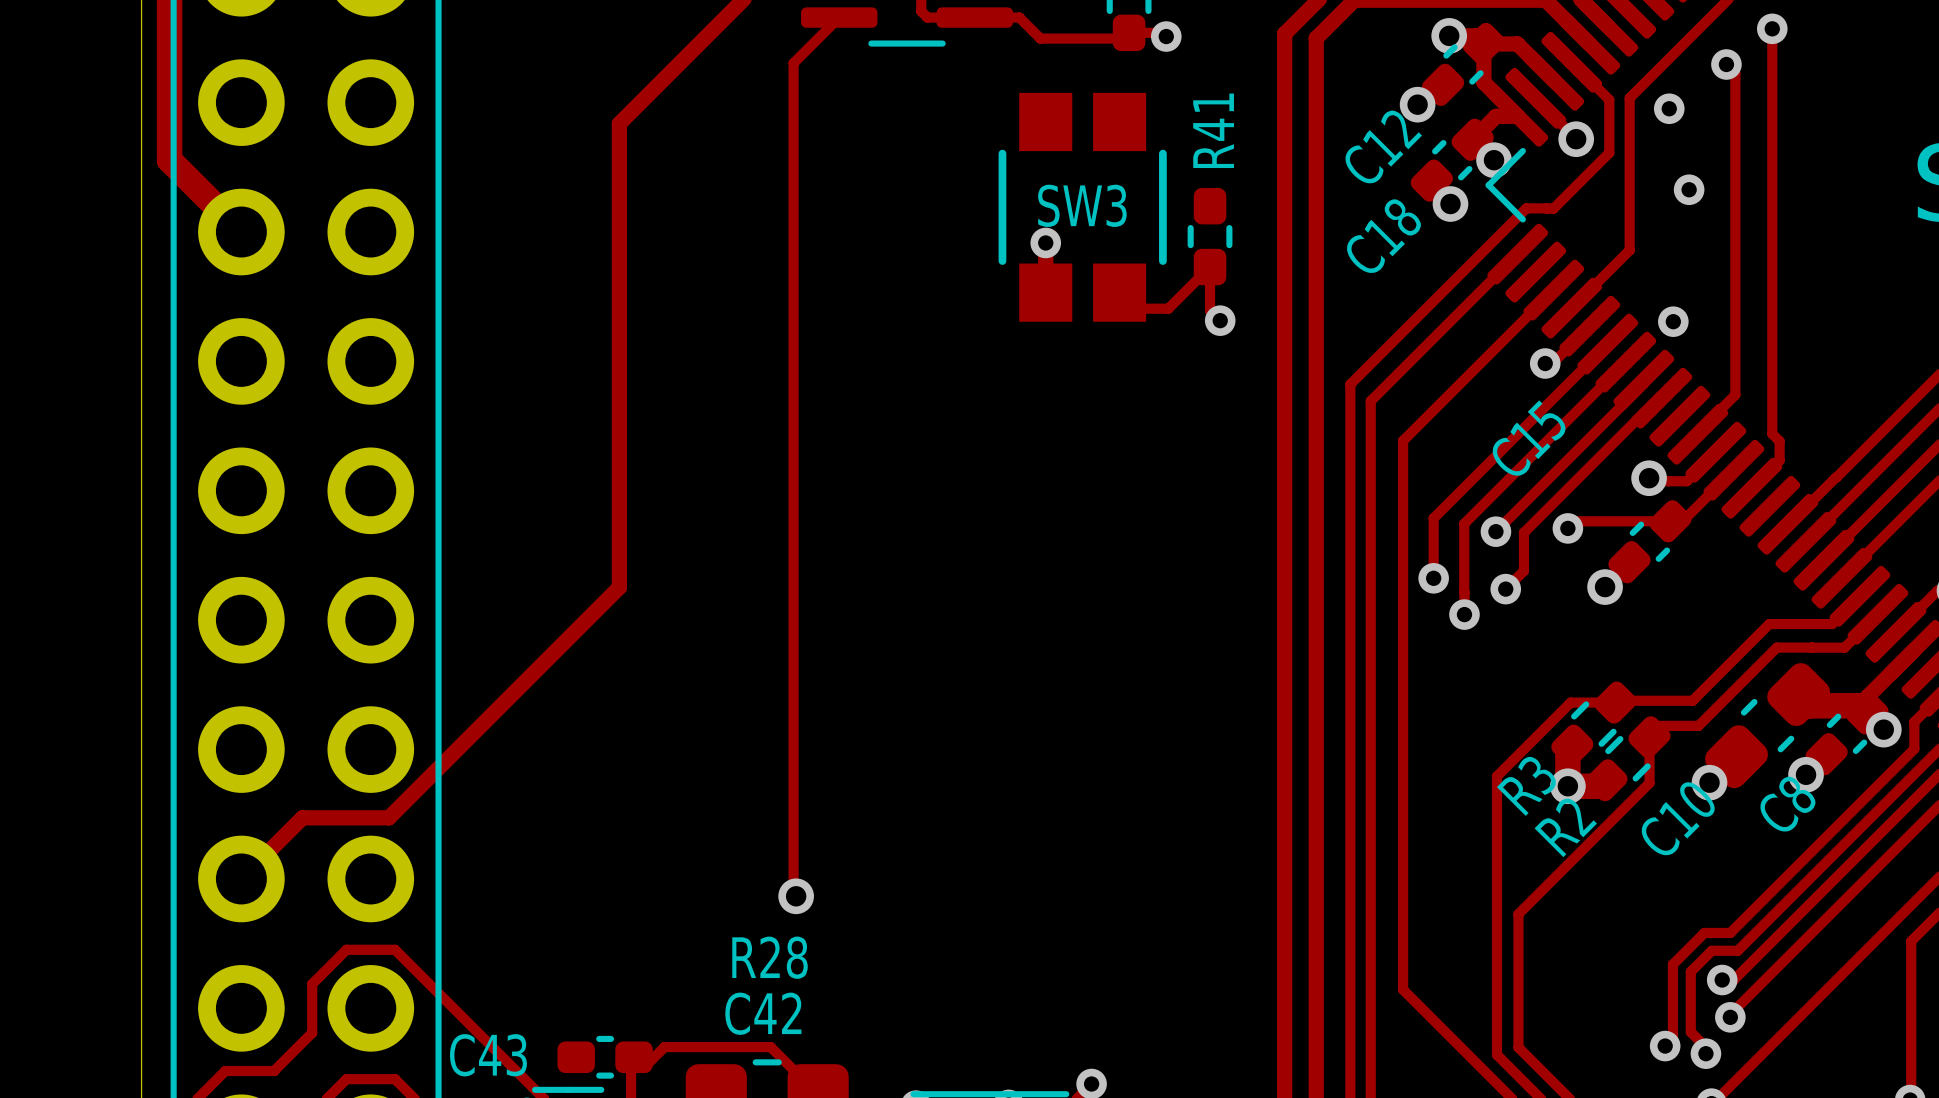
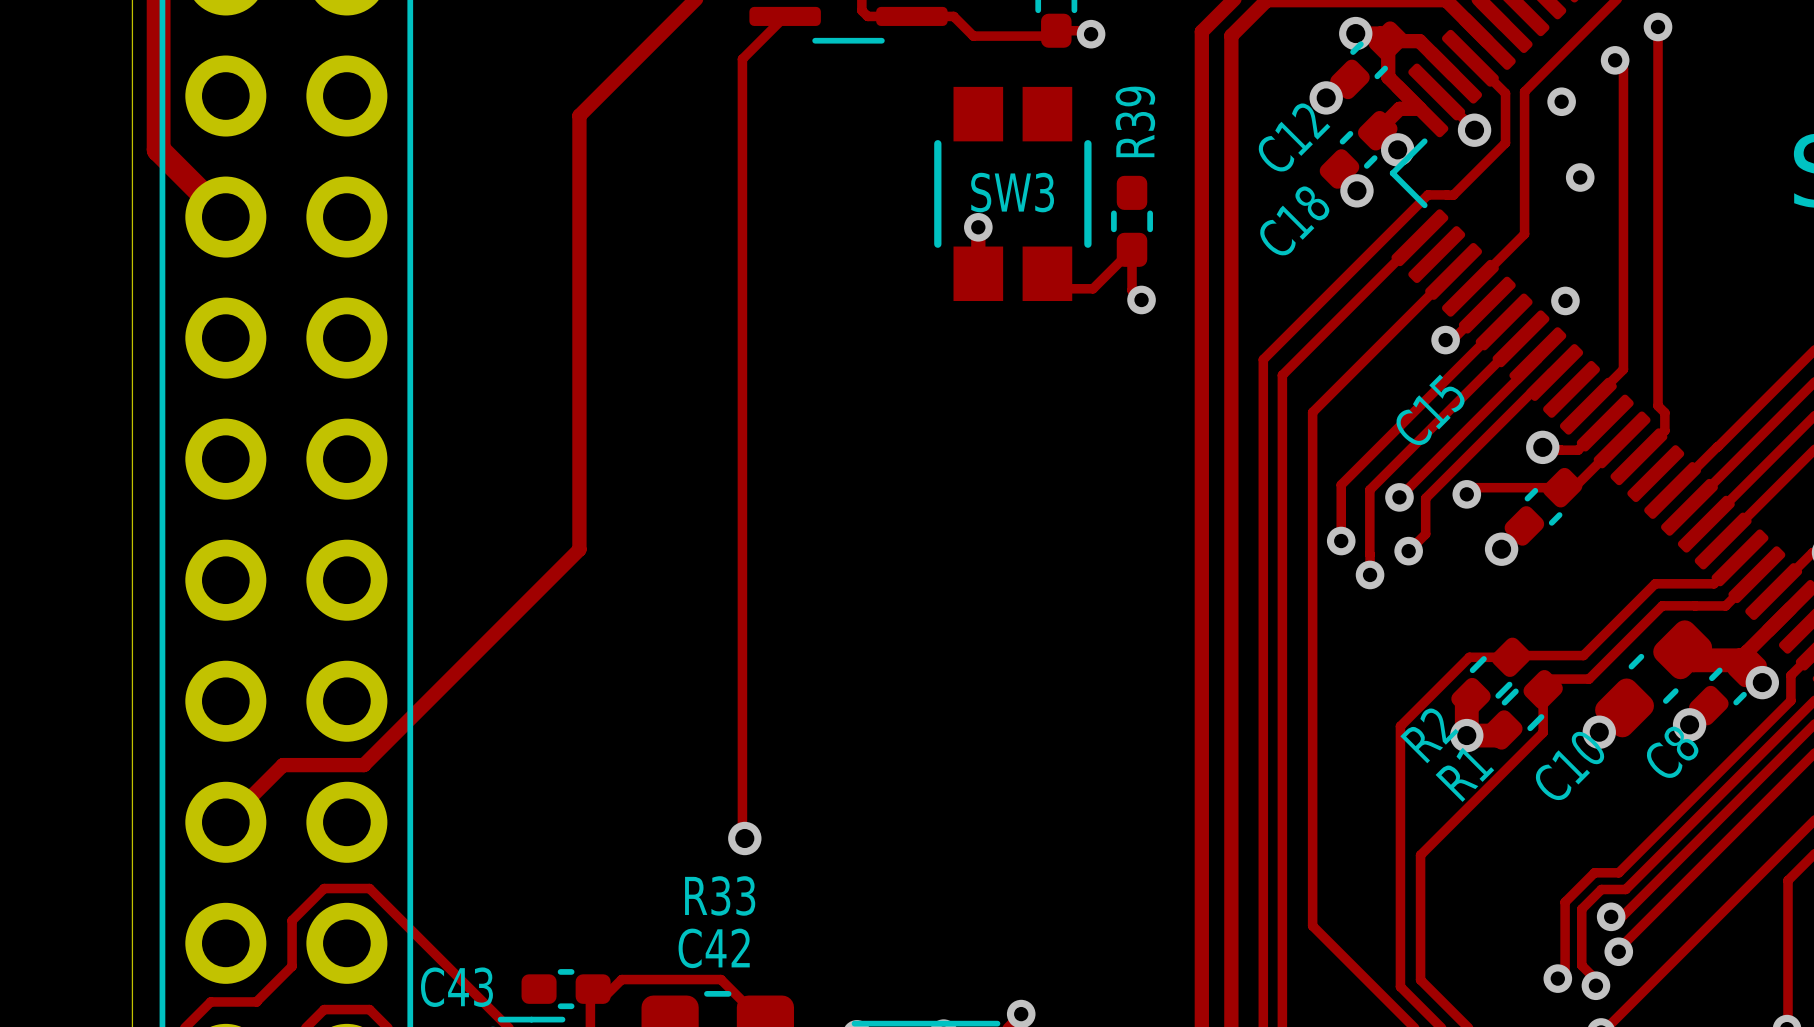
R41 name: R41 (1213, 130) -> R39 (1135, 121)
R3 name: R3 (1526, 786) -> R2 (1429, 735)
R2 name: R2 (1565, 827) -> R1 (1464, 774)
R28 name: R28 (770, 957) -> R33 (720, 895)

